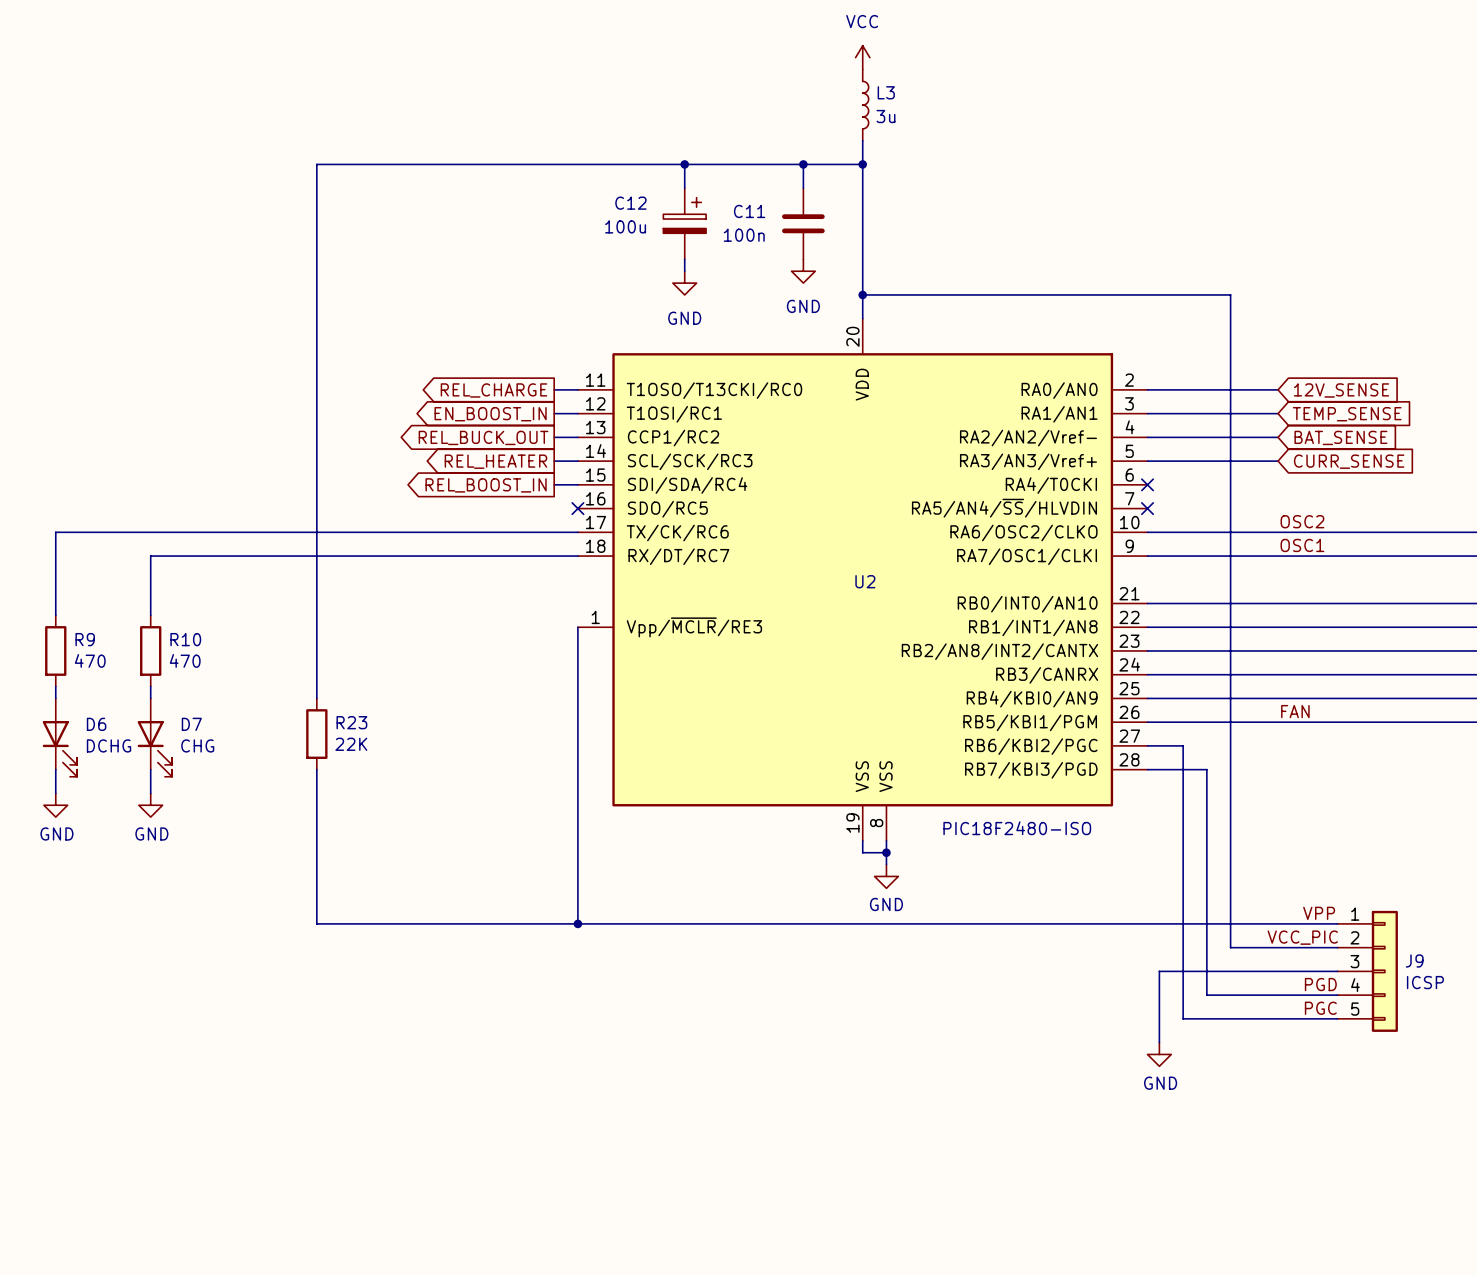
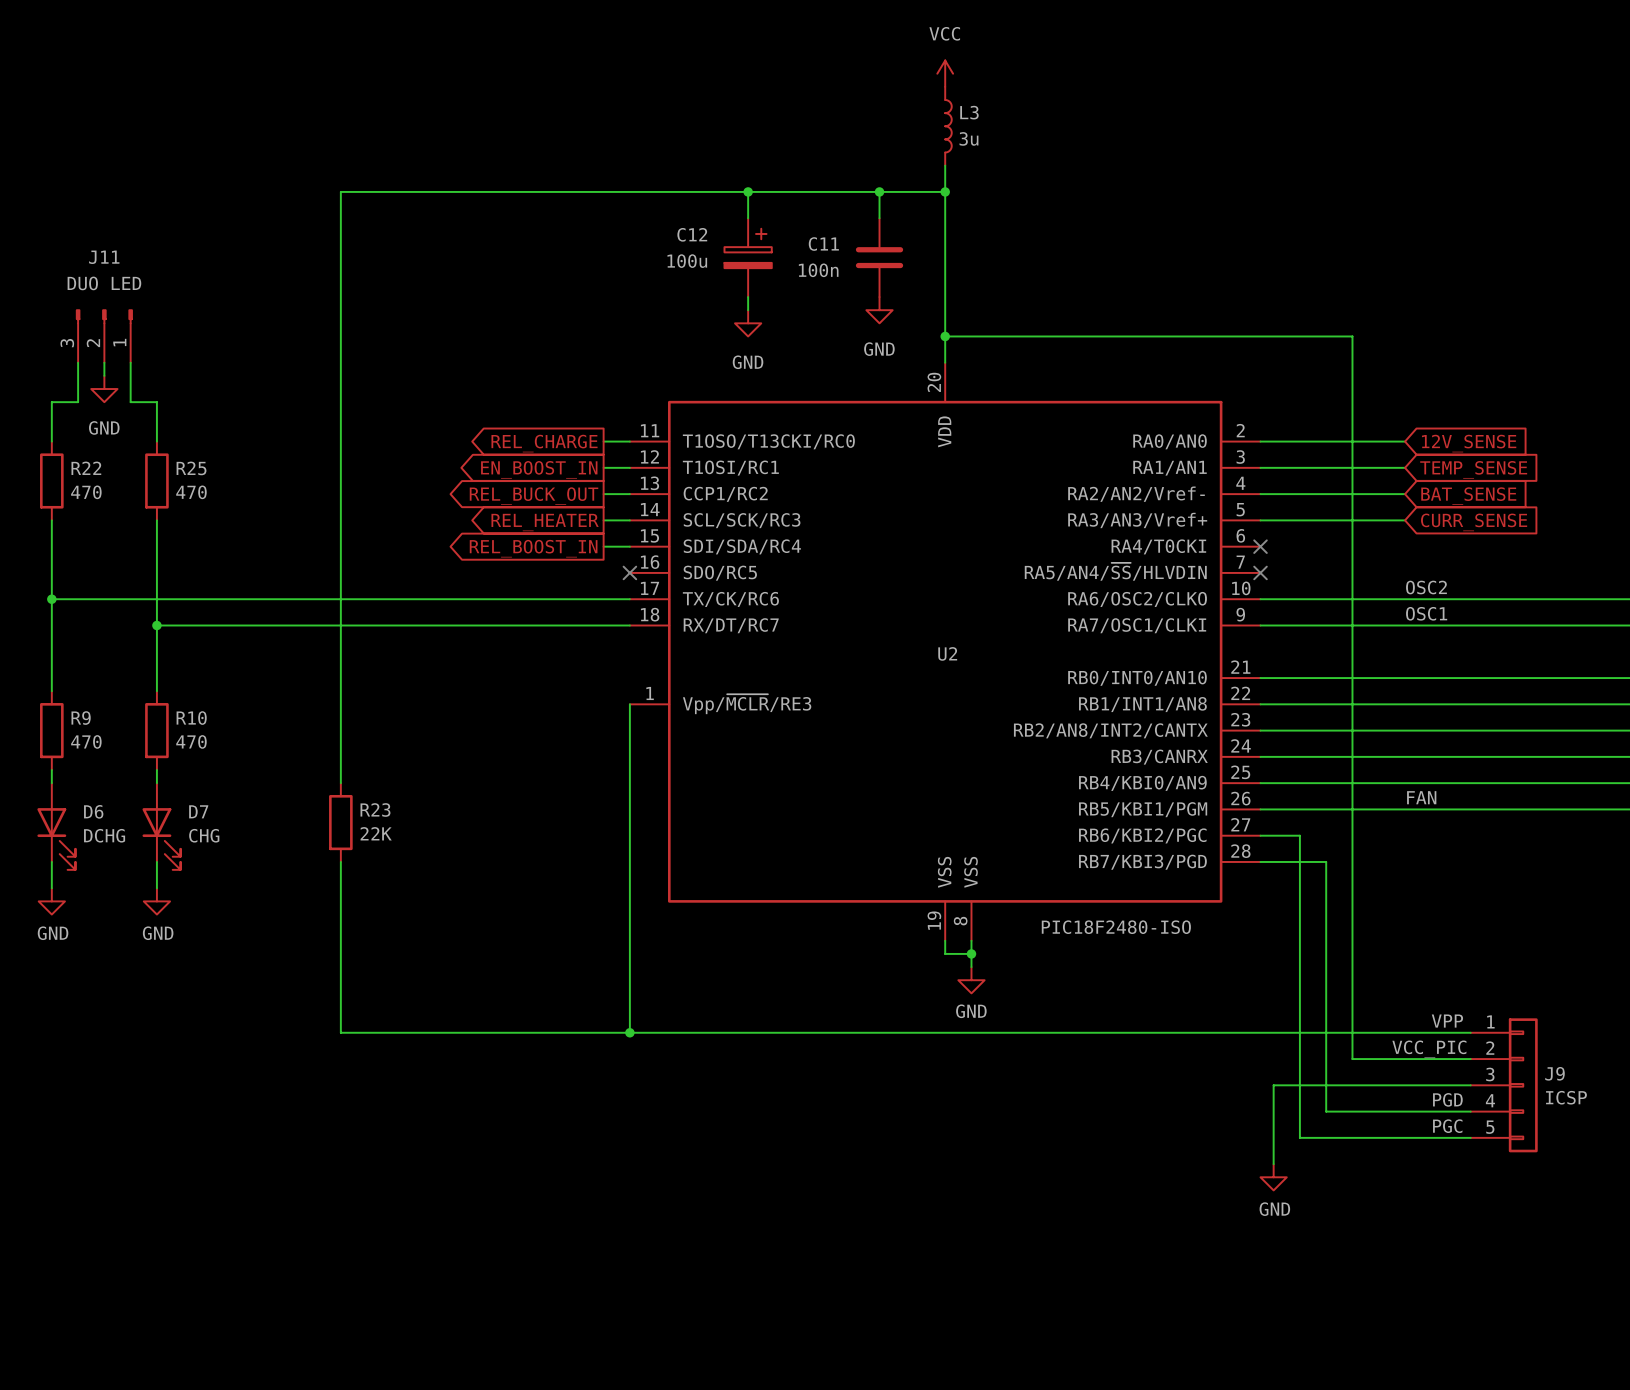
J11: none -> DUO LED (104, 336)
wire: none -> (78, 362) (78, 402) (51, 402) (51, 441)
wire: none -> (104, 362) (104, 375)
wire: none -> (130, 362) (130, 402) (156, 402) (156, 441)
power symbol: none -> GND (104, 389)
R22: none -> 470 (51, 480)
R25: none -> 470 (156, 480)
wire: none -> (51, 520) (51, 599)
wire: none -> (156, 520) (156, 625)
junction: none -> (51, 599)
junction: none -> (156, 625)

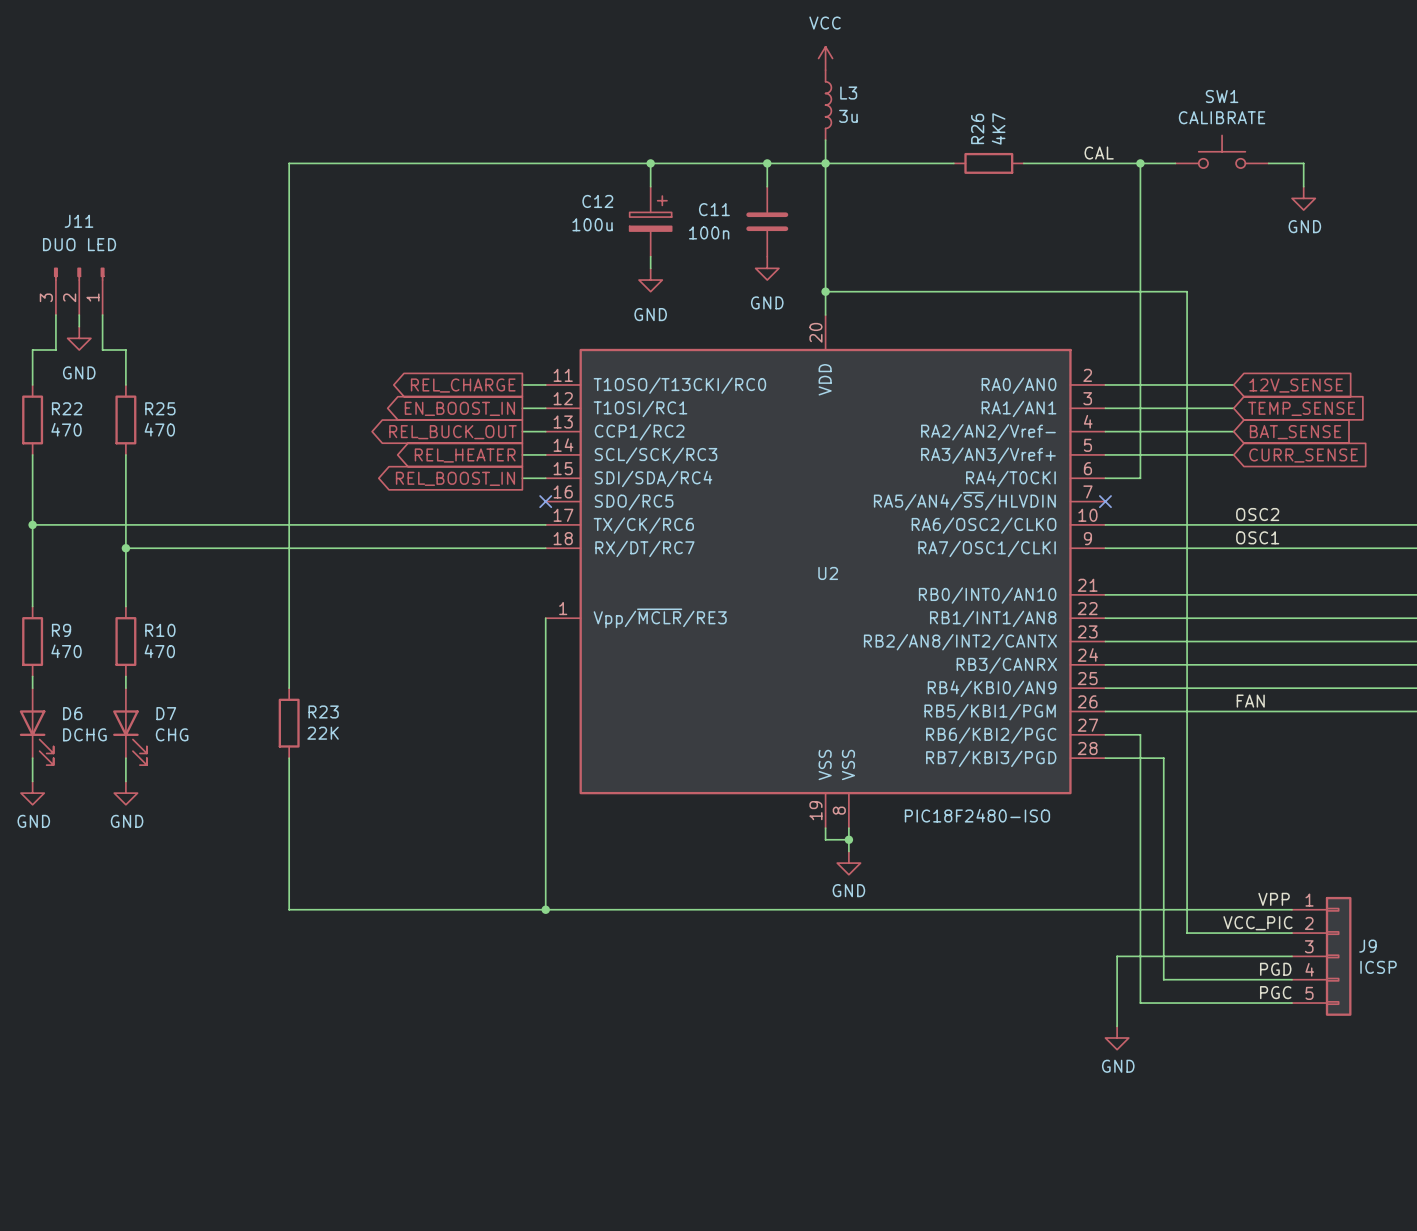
SW1: none -> CALIBRATE (1222, 151)
label: none -> CAL (1099, 153)
wire: none -> (825, 163) (953, 163)
R26: none -> 4K7 (988, 163)
wire: none -> (1023, 163) (1175, 163)
wire: none -> (1140, 163) (1140, 478) (1105, 478)
junction: none -> (1140, 163)
wire: none -> (1268, 163) (1303, 163) (1303, 186)
power symbol: none -> GND (1303, 198)
no-connect mark: (1260, 546) -> none

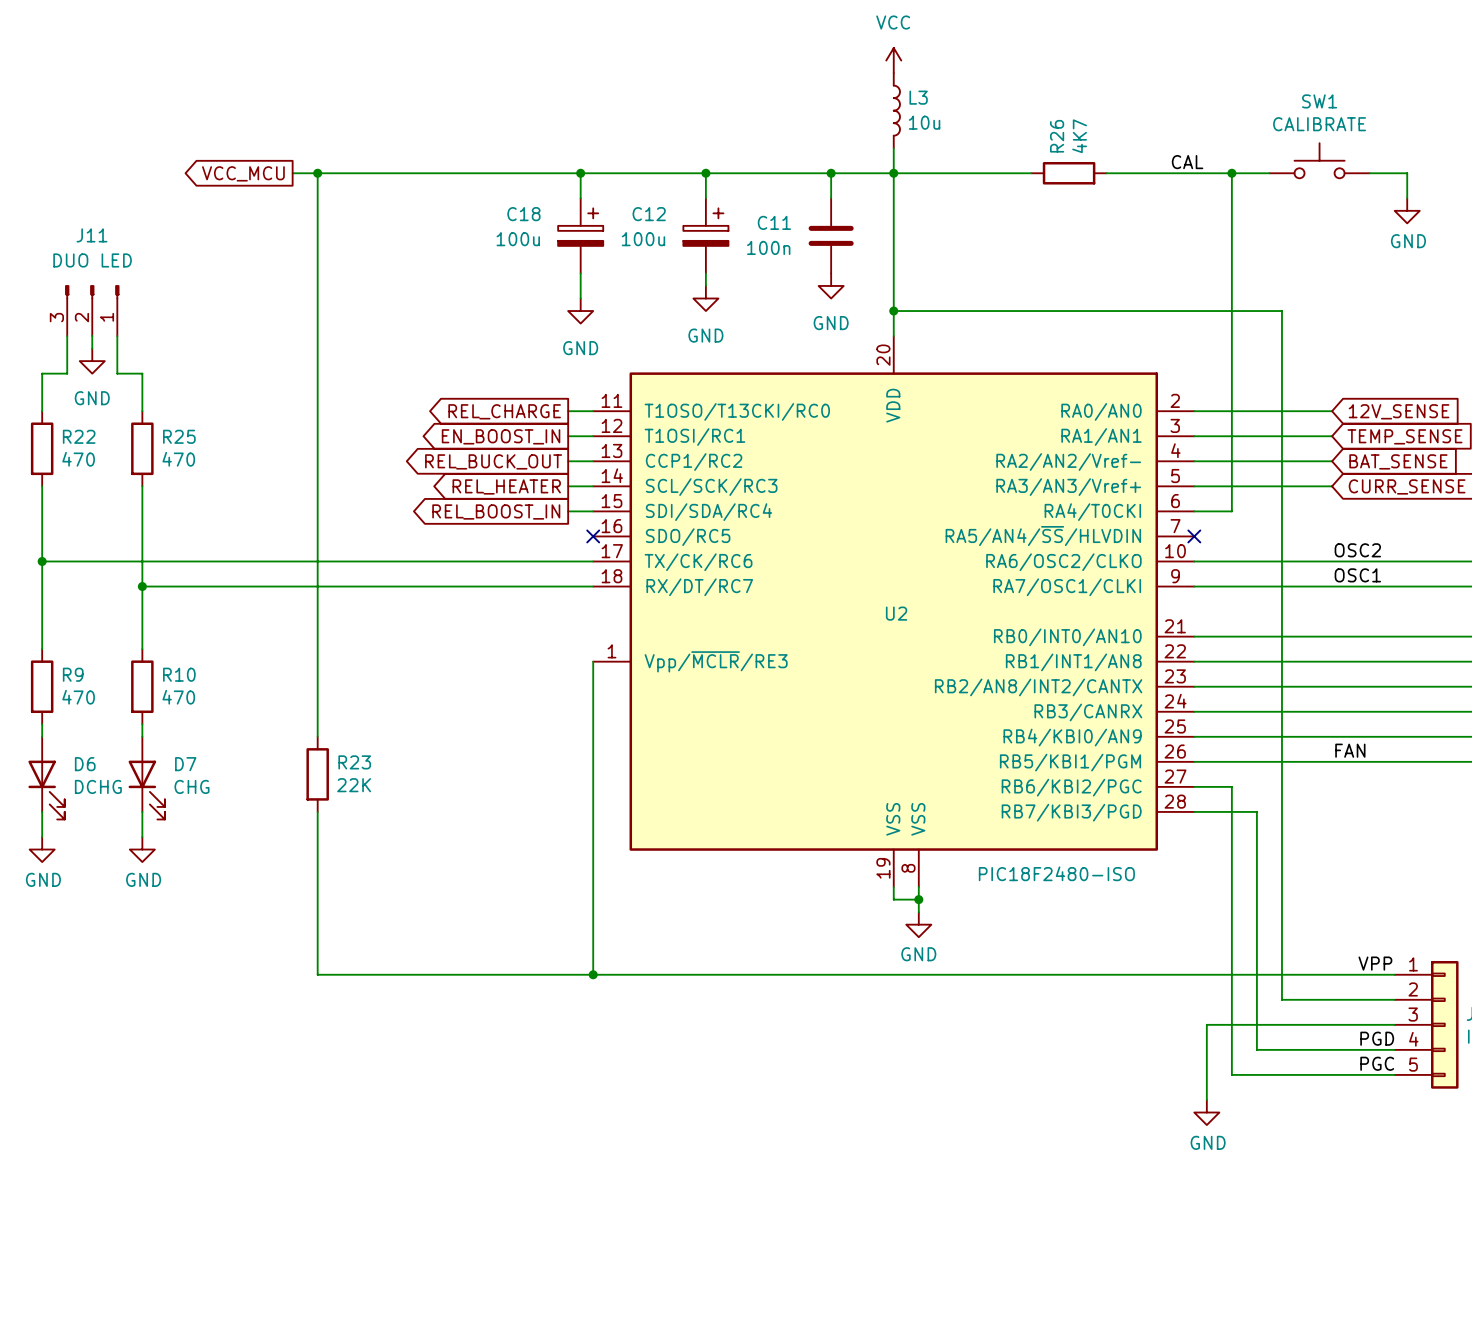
L3 value: 3u (848, 116) -> 10u (924, 122)
global label: none -> VCC_MCU (243, 173)
wire: none -> (292, 173) (317, 173)
junction: none -> (317, 173)
wire: none -> (580, 173) (580, 198)
junction: none -> (580, 173)
C18: none -> 100u (580, 235)
wire: none -> (580, 273) (580, 298)
power symbol: none -> GND (580, 311)
label: VCC_PIC (1257, 923) -> none

